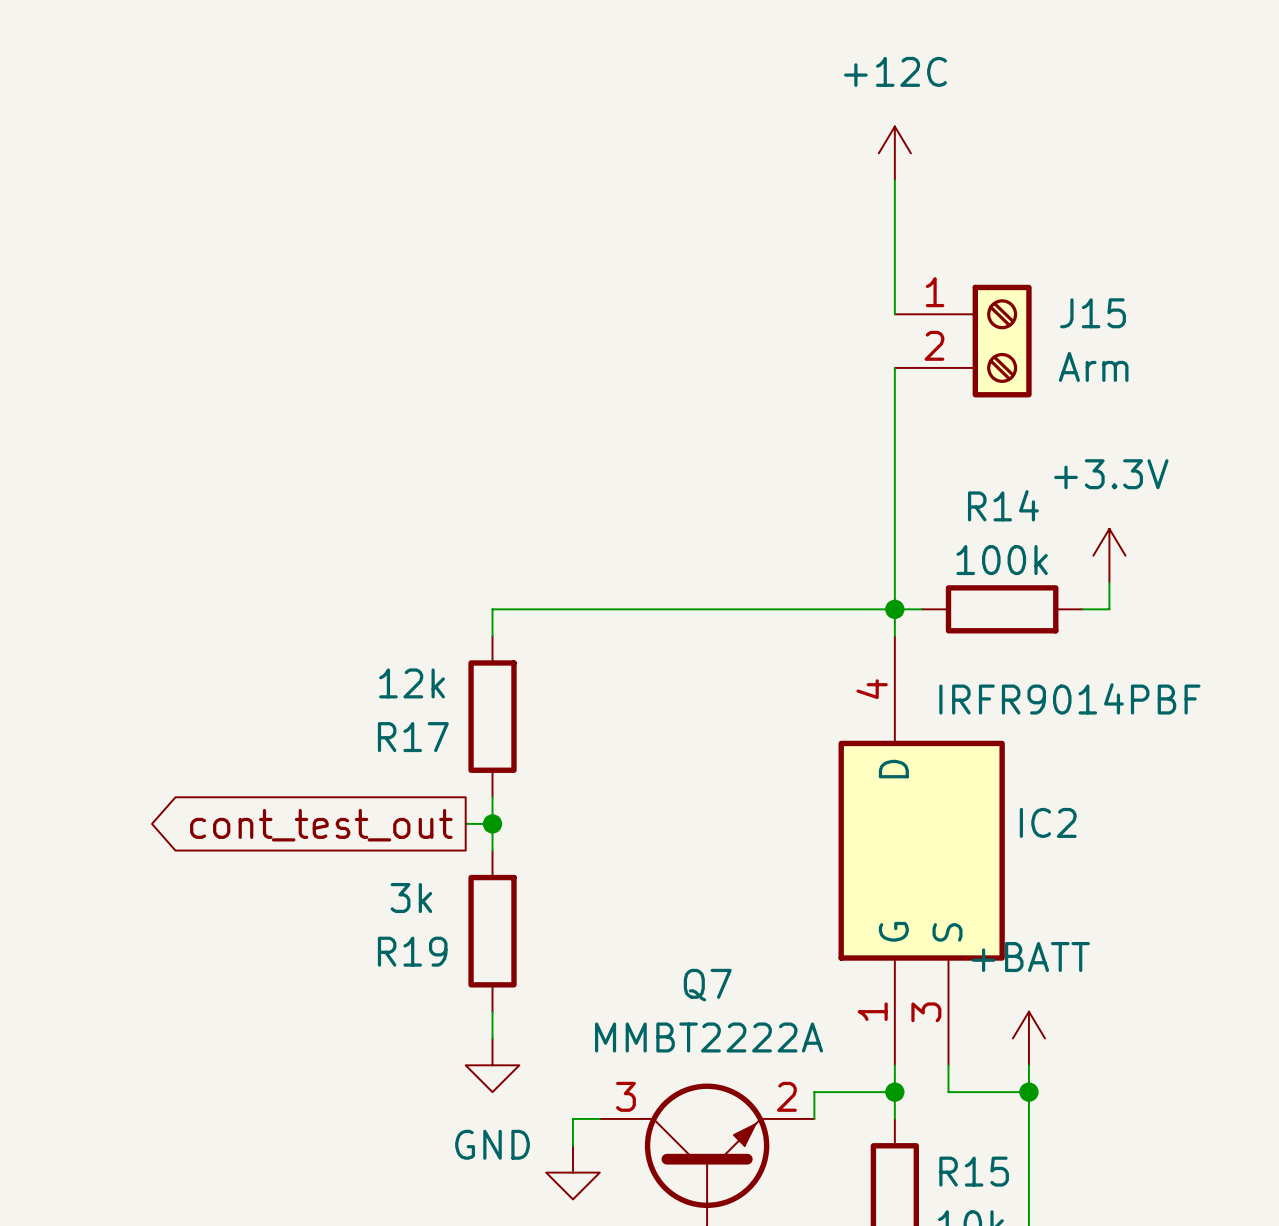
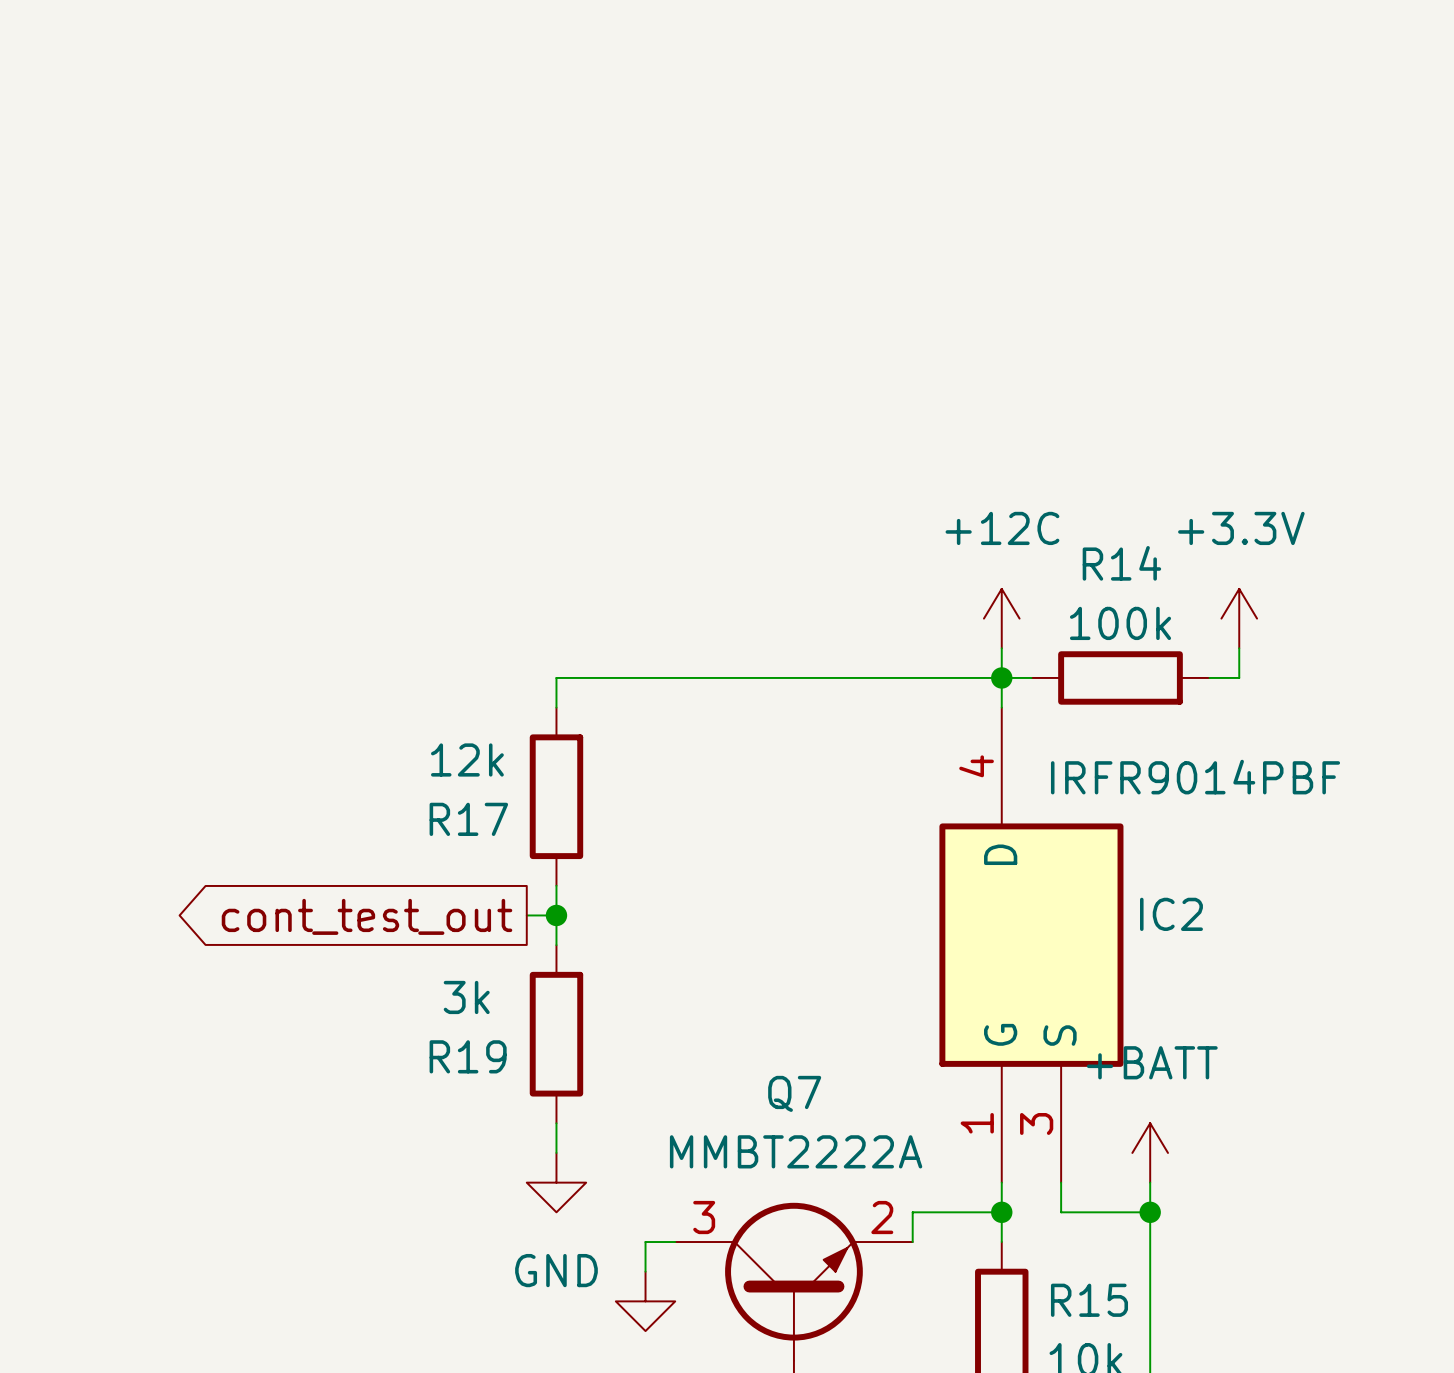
power symbol position: +12C (894, 153) -> +12C (1001, 618)
wire: (894, 180) (894, 314) -> none
J15: Arm (963, 341) -> none
wire: (894, 367) (894, 582) -> none

